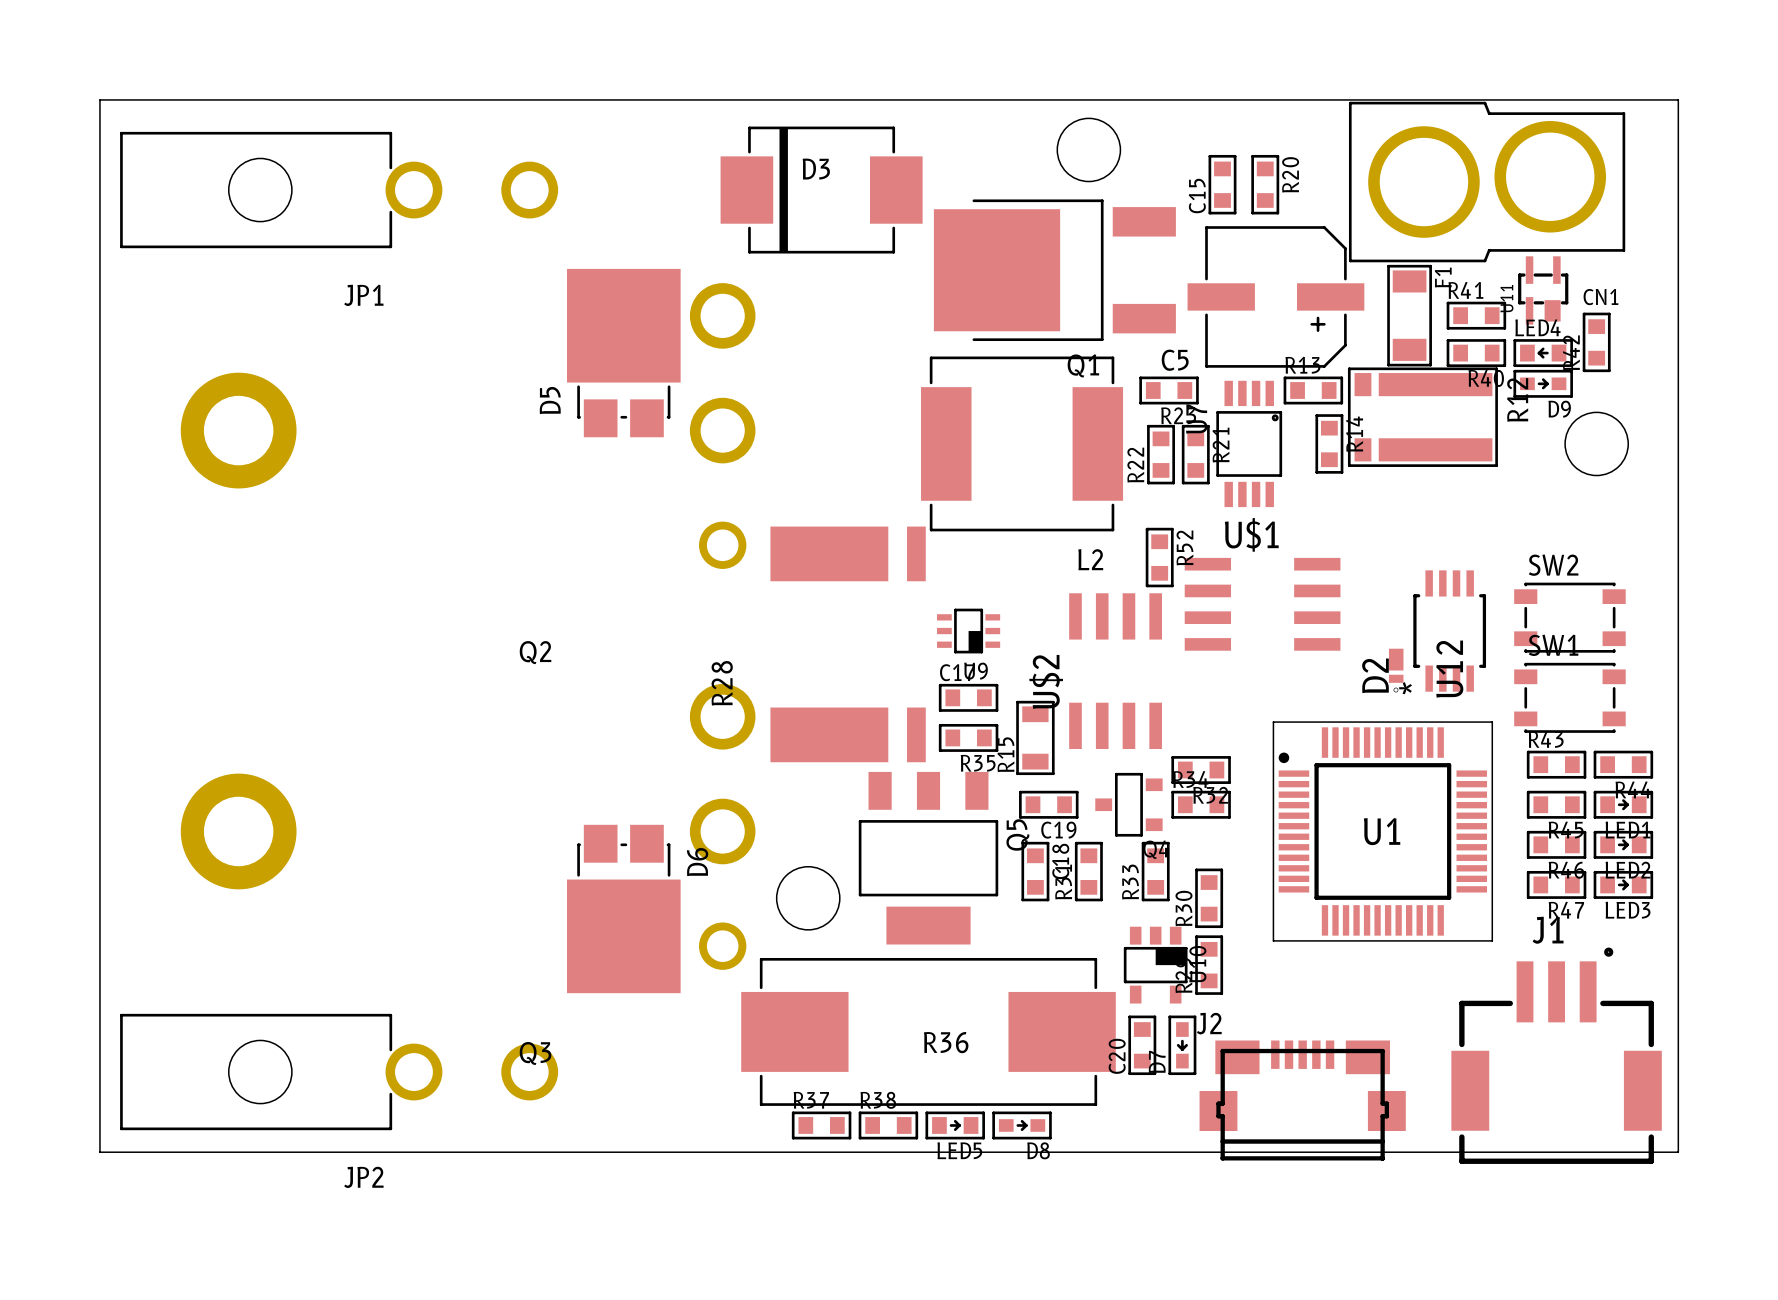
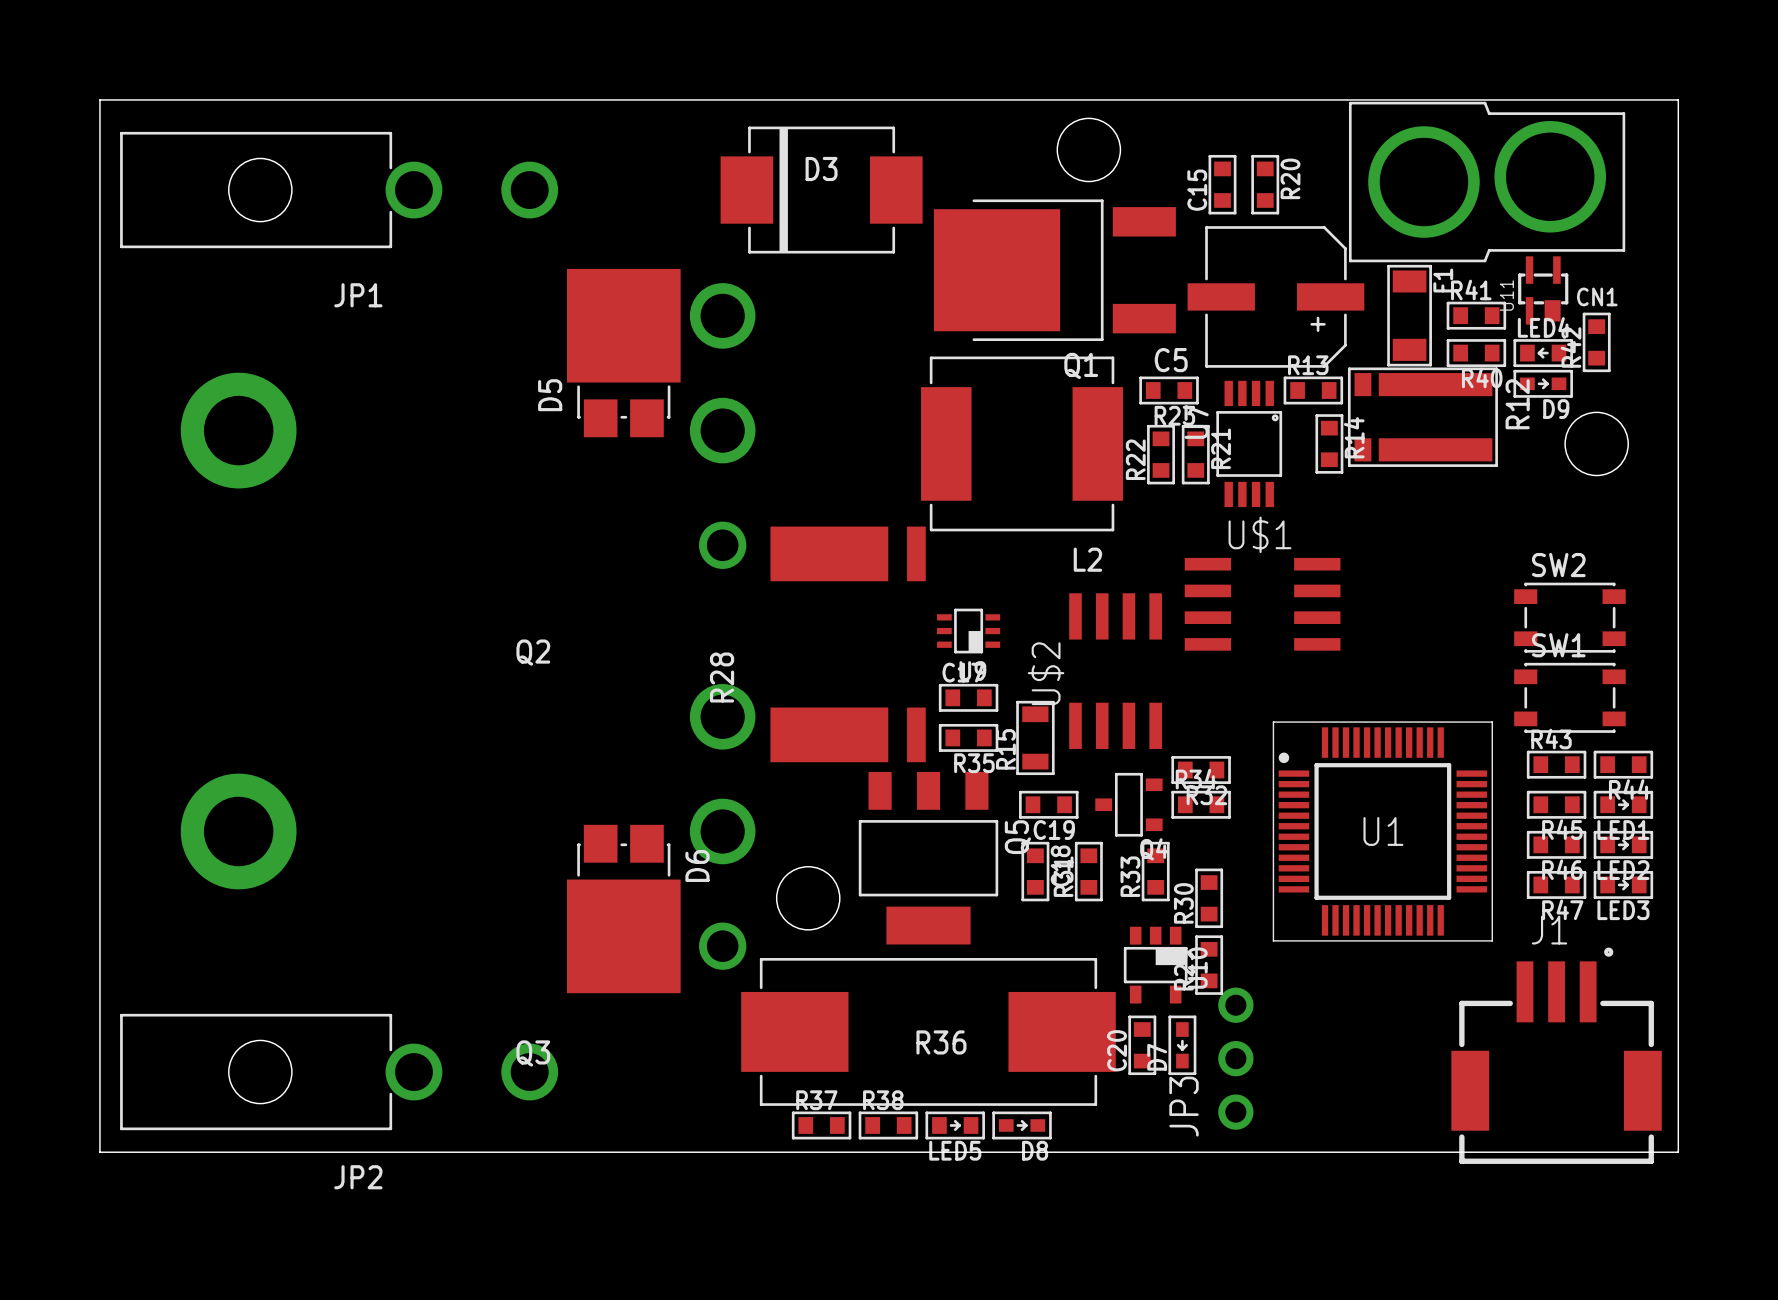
R52: (1159, 557) -> none
U12: (1449, 631) -> none
D2: (1396, 670) -> none
JP3: none -> (1235, 1058)
J2: (1302, 1100) -> none

